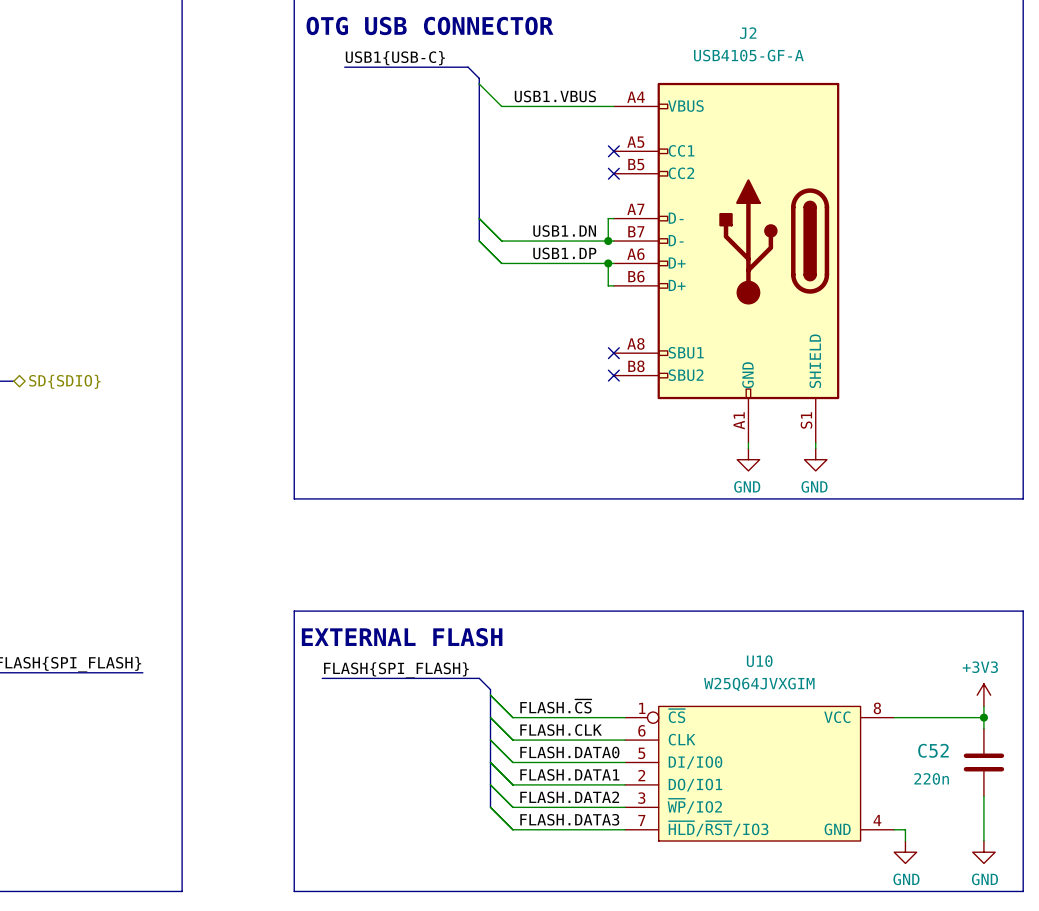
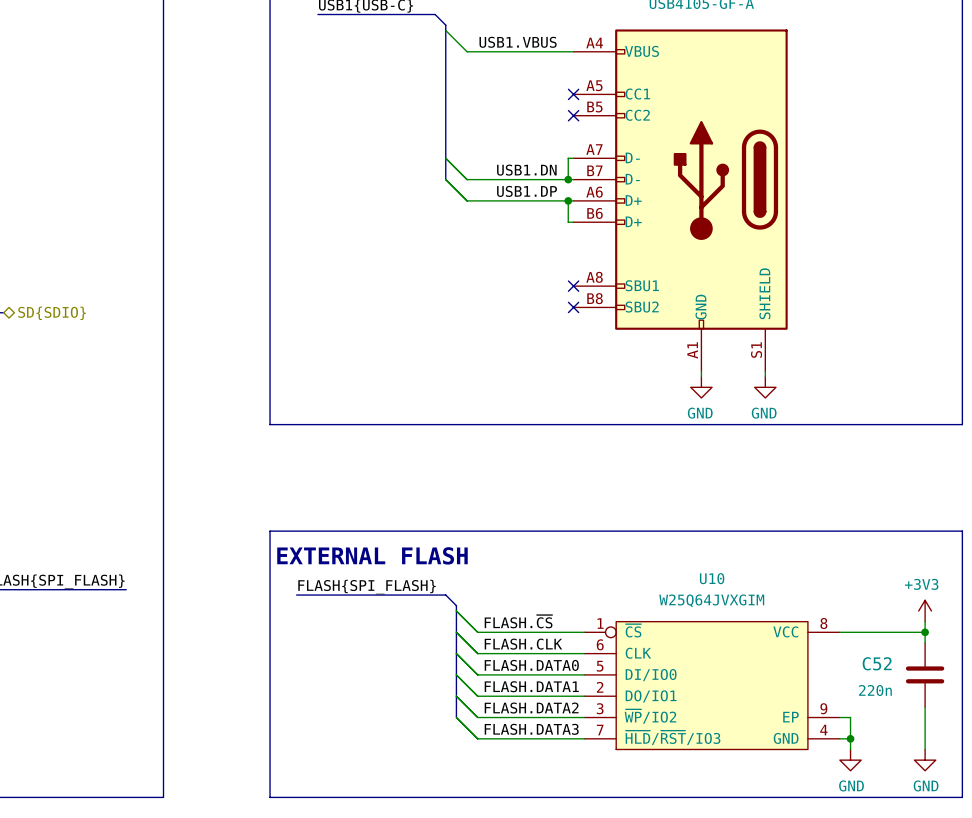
U10 symbol: [625, 706, 895, 841] -> [584, 621, 840, 750]
wire: none -> (839, 717) (850, 717) (850, 738)
junction: none -> (850, 738)

